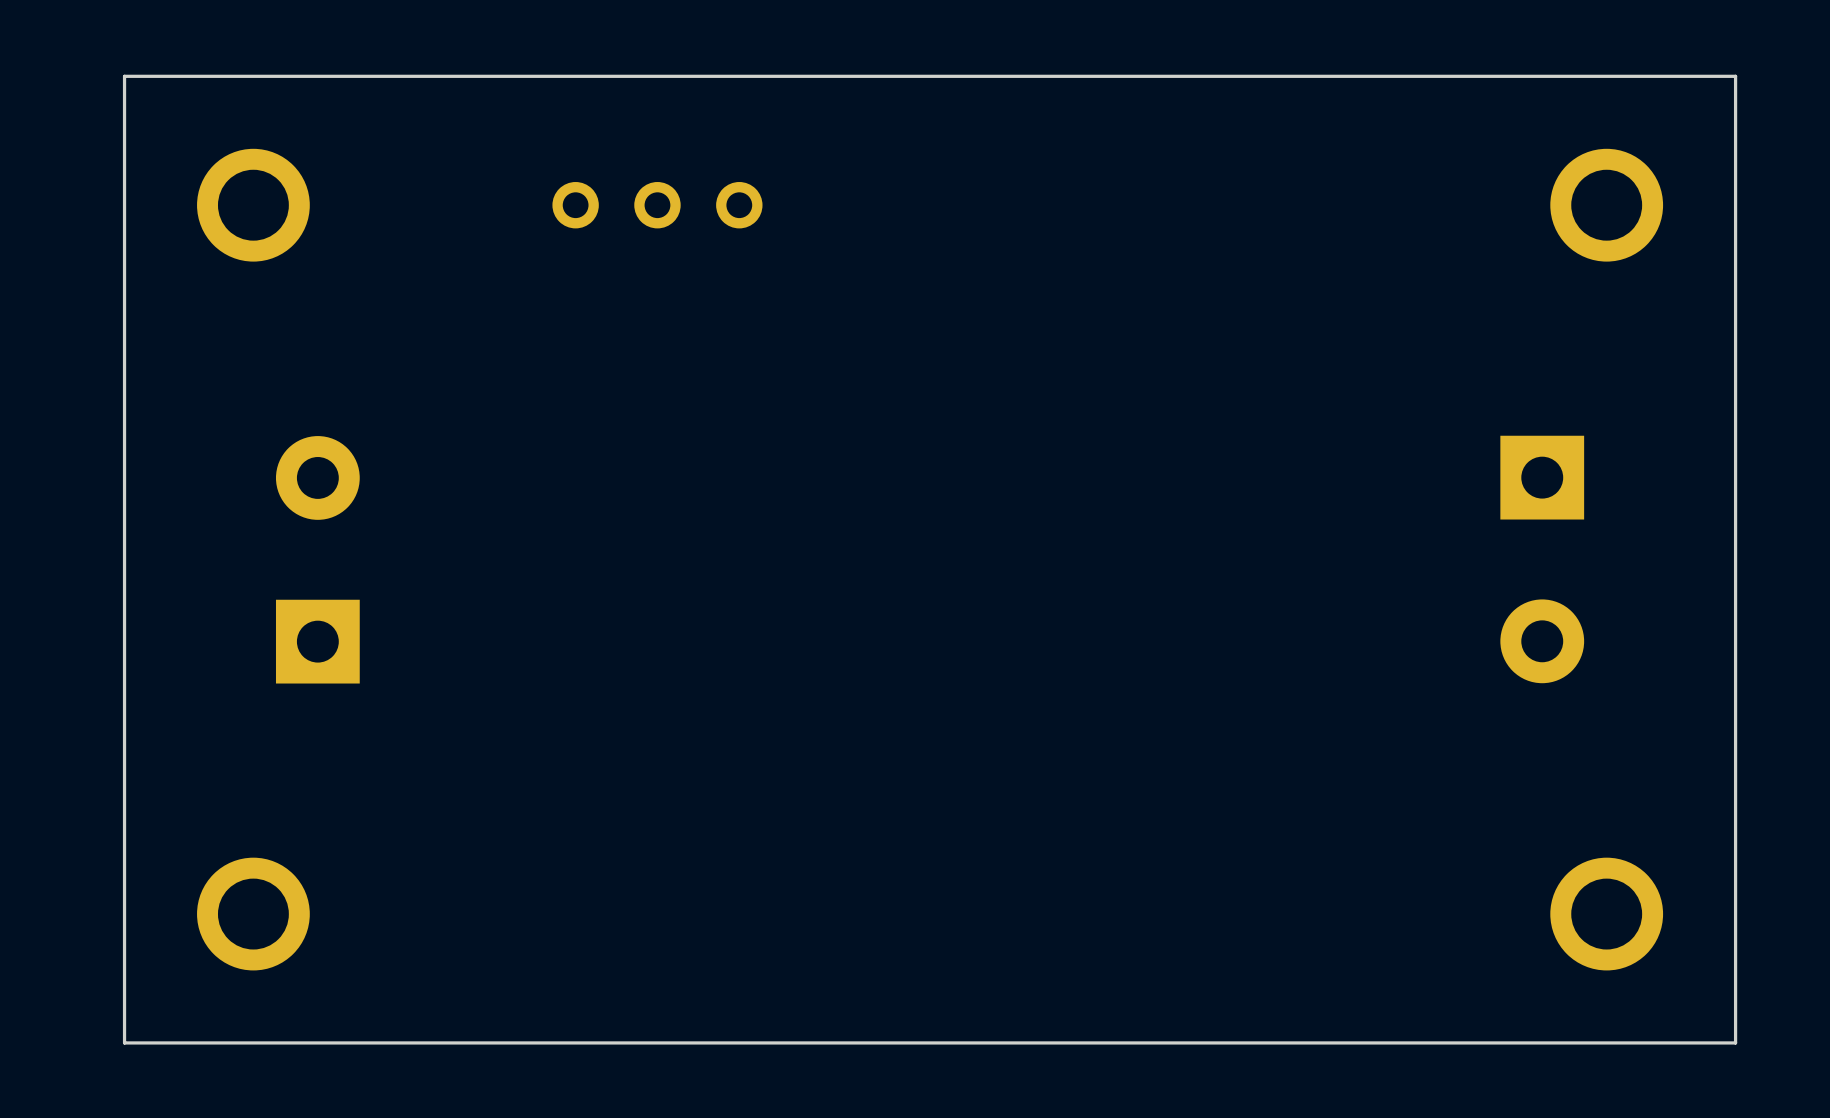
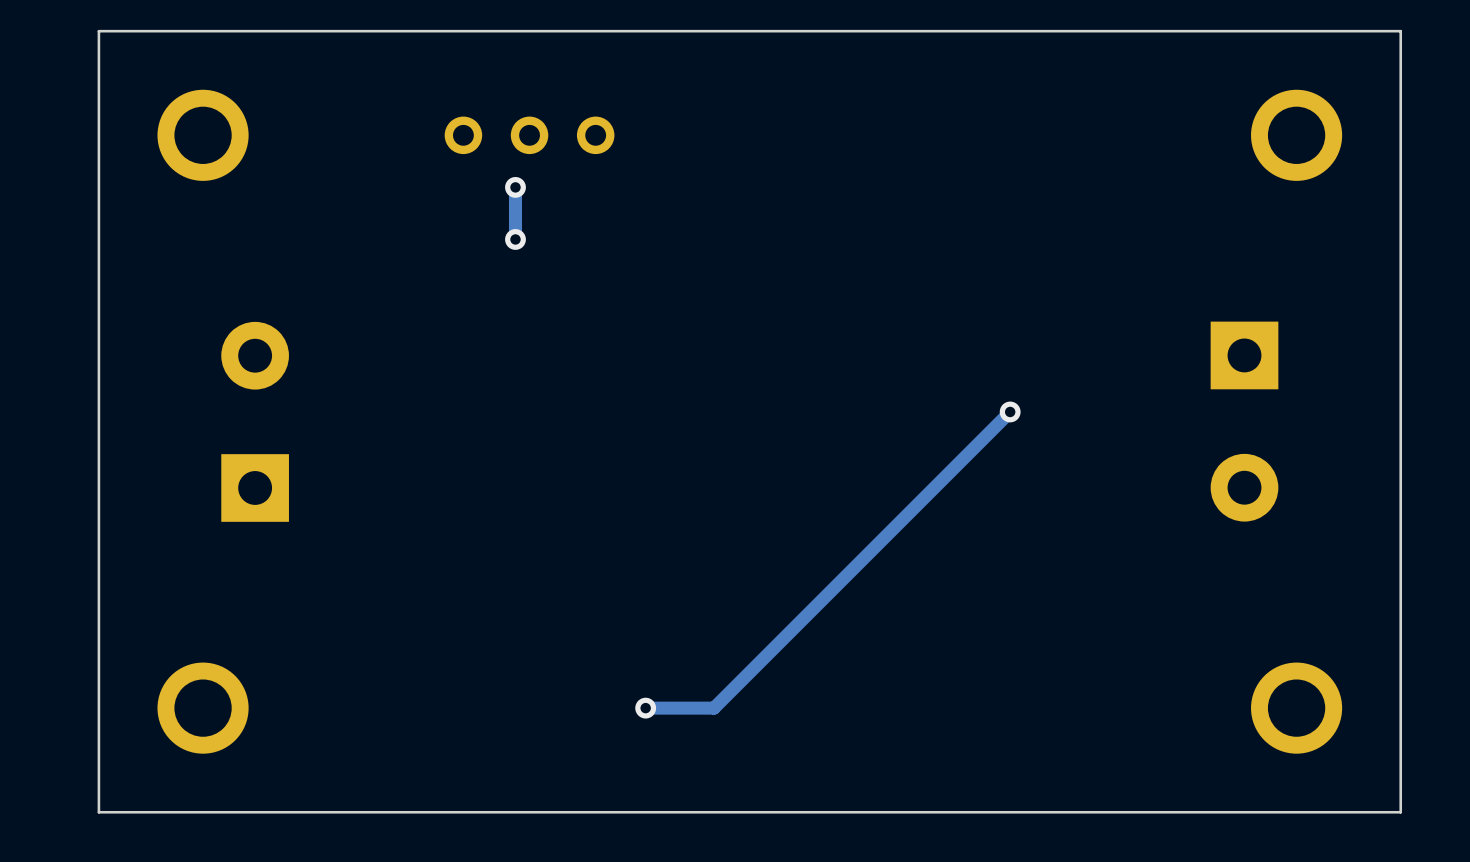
track: none -> (515, 187) (515, 239)
via: none -> (515, 187)
via: none -> (515, 239)
track: none -> (1010, 411) (714, 708) (645, 708)
via: none -> (1010, 411)
via: none -> (645, 708)

